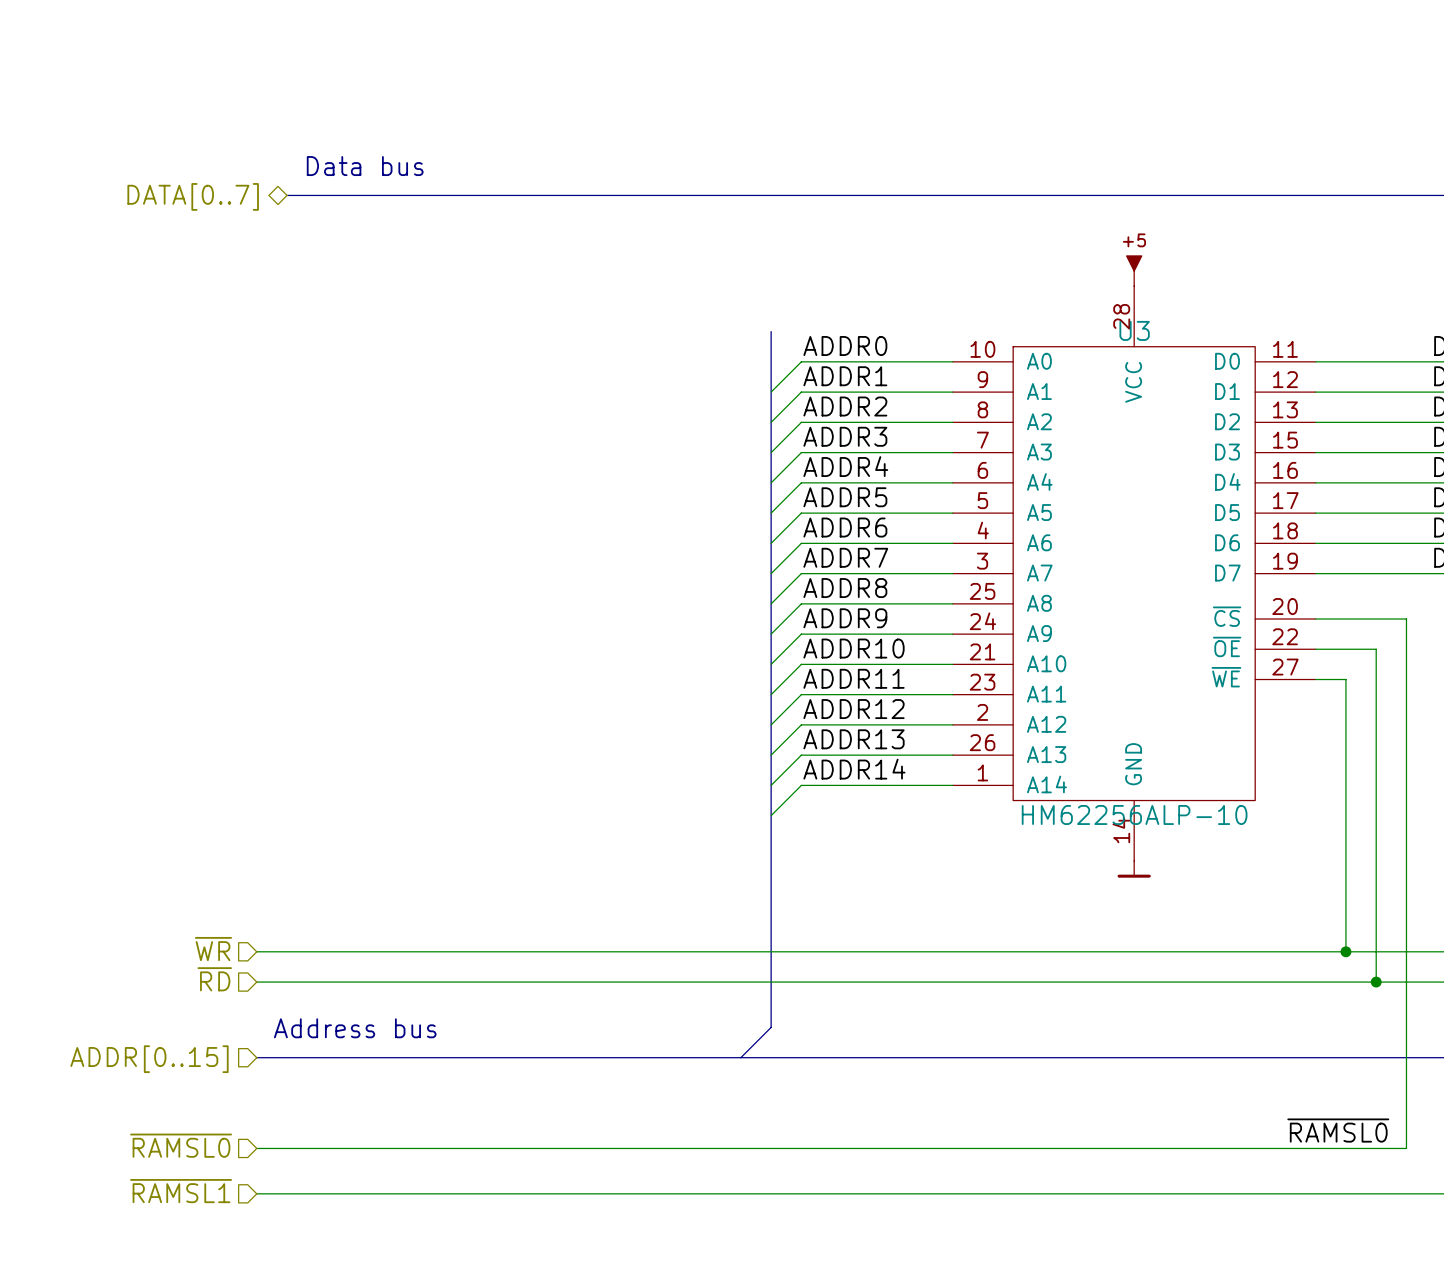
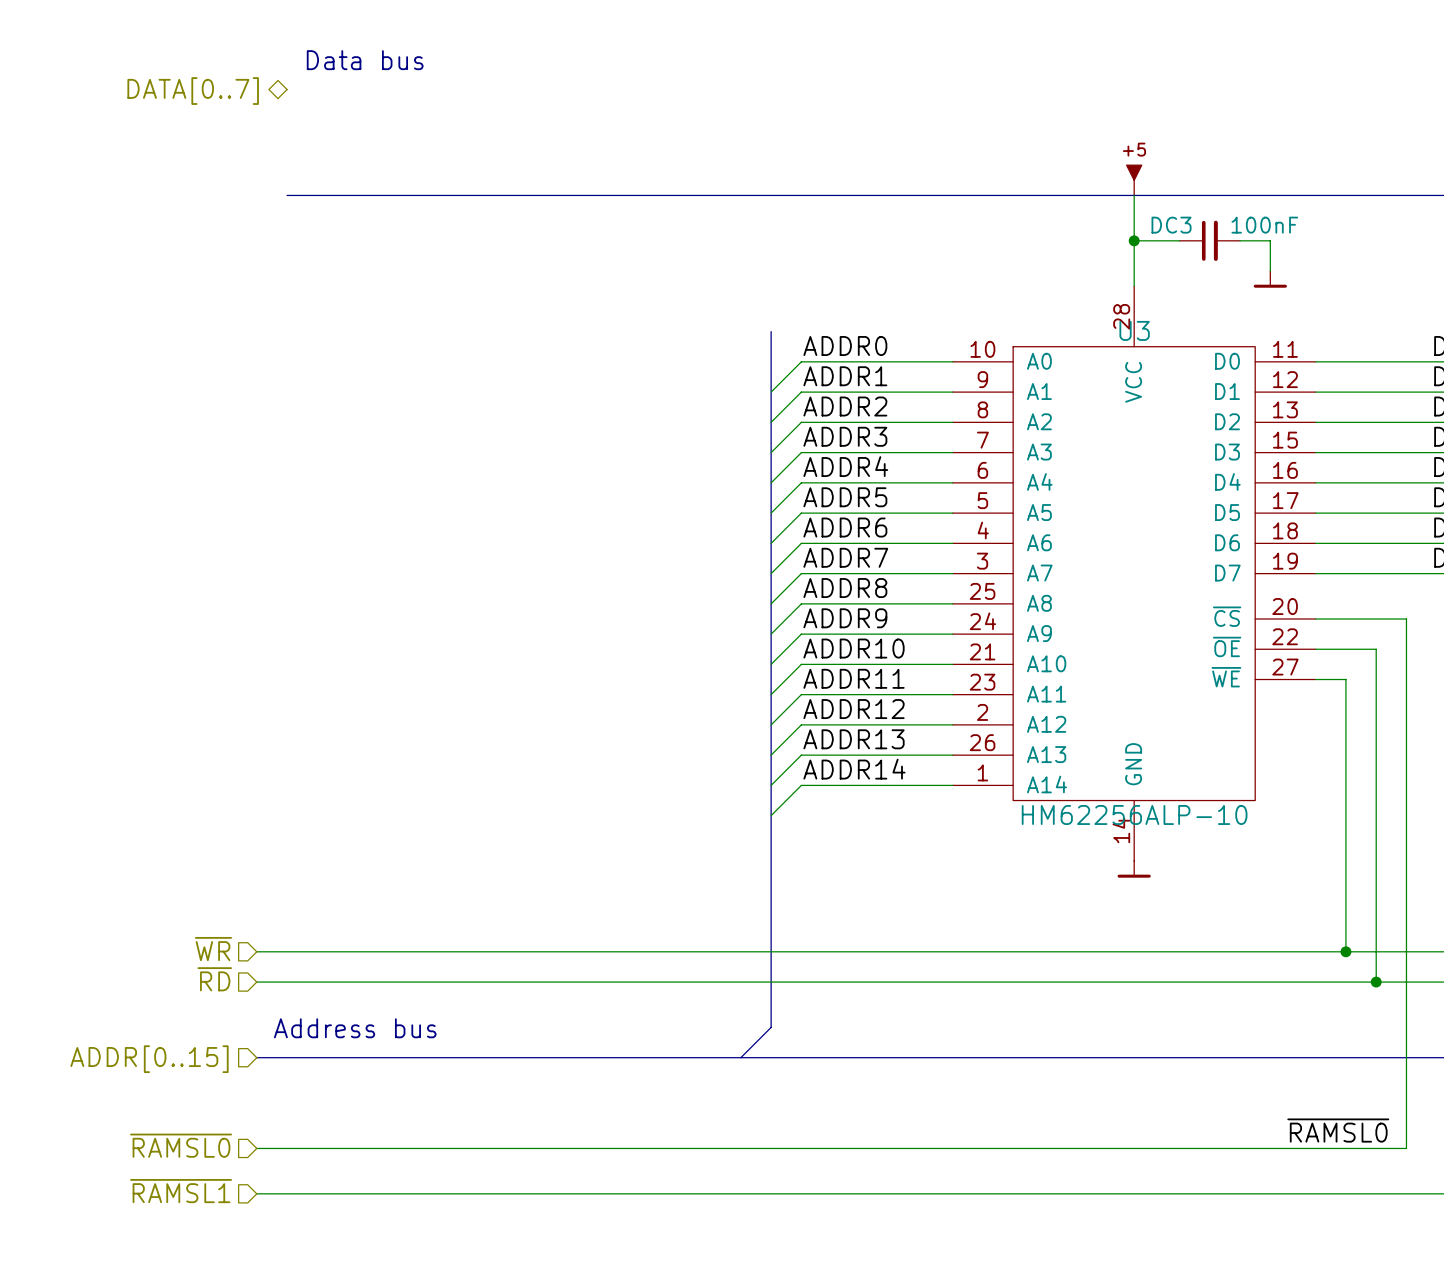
text position: Data bus (365, 166) -> Data bus (365, 60)
wire: none -> (1134, 195) (1134, 286)
hierarchical label position: DATA[0..7] (193, 196) -> DATA[0..7] (193, 91)
wire: none -> (1134, 240) (1179, 240)
junction: none -> (1134, 240)
DC3: none -> 100nF (1209, 240)
wire: none -> (1240, 240) (1270, 240) (1270, 271)
power symbol position: (1134, 271) -> (1134, 180)
power symbol: none -> (1270, 279)

